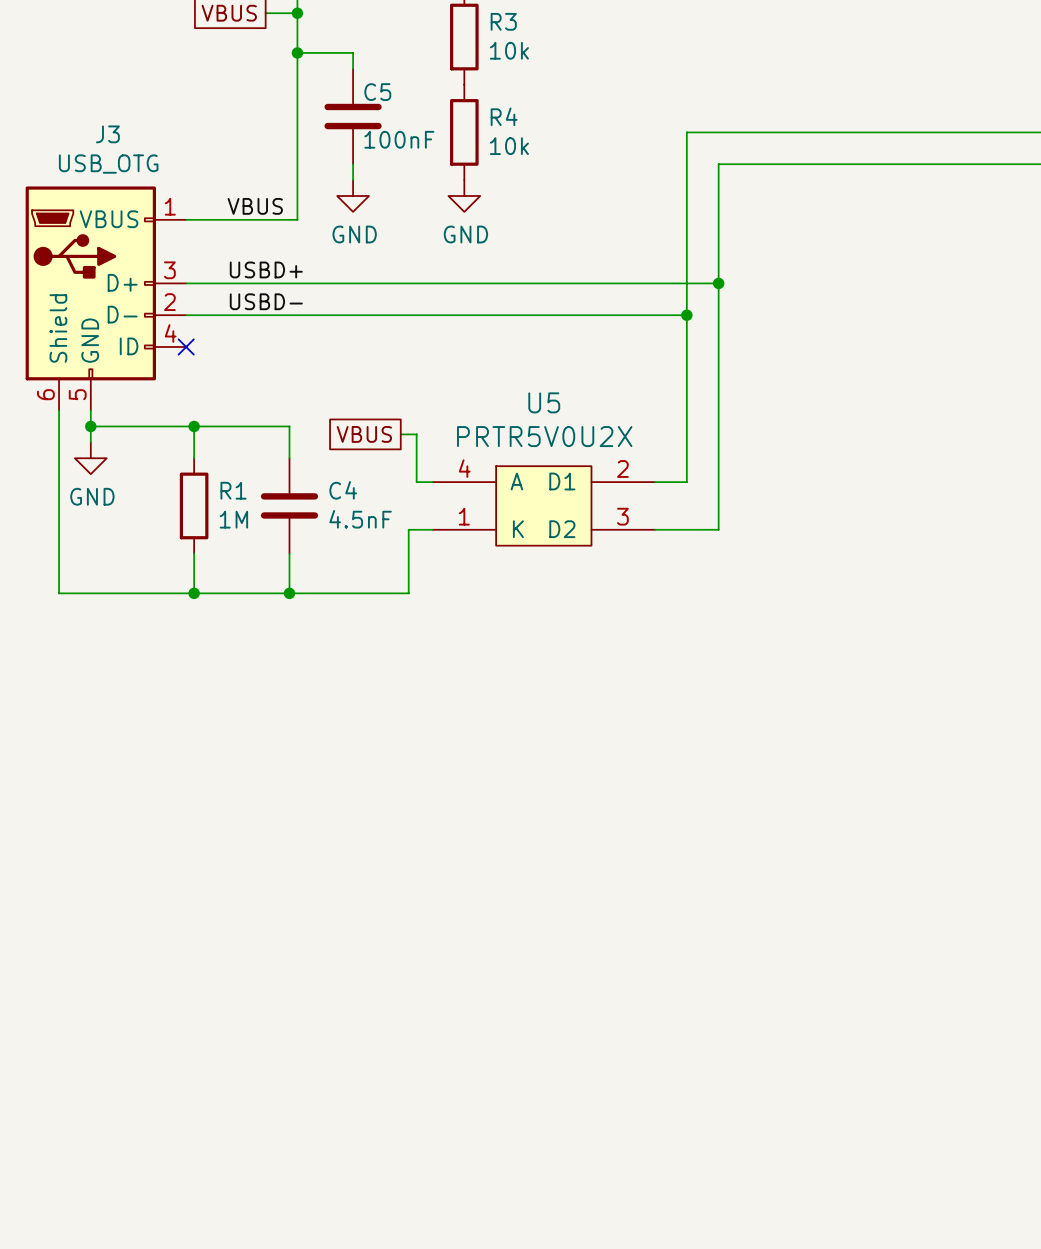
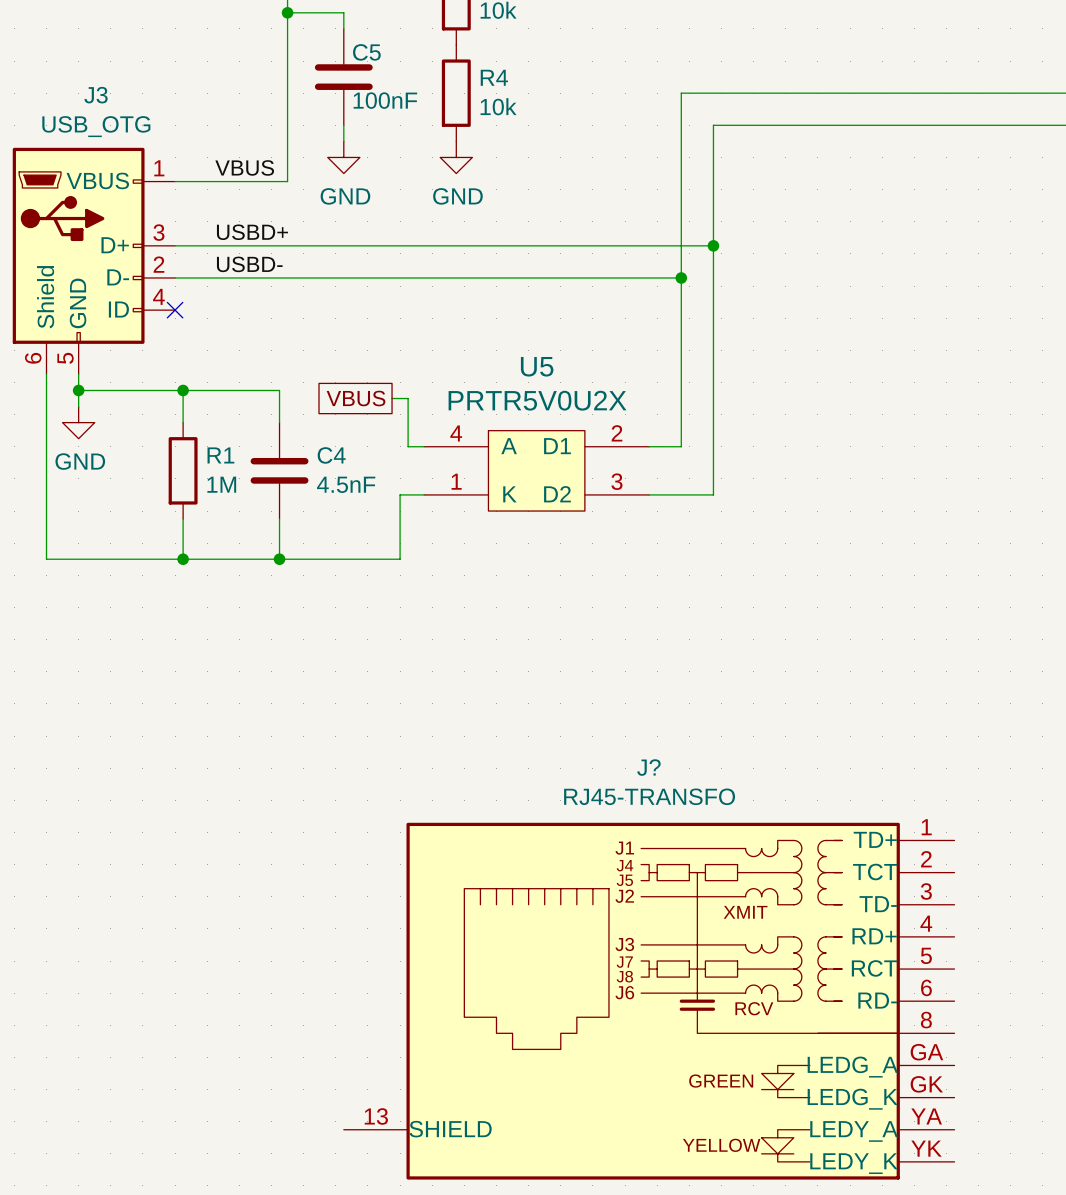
J?: none -> RJ45-TRANSFO (649, 1001)

